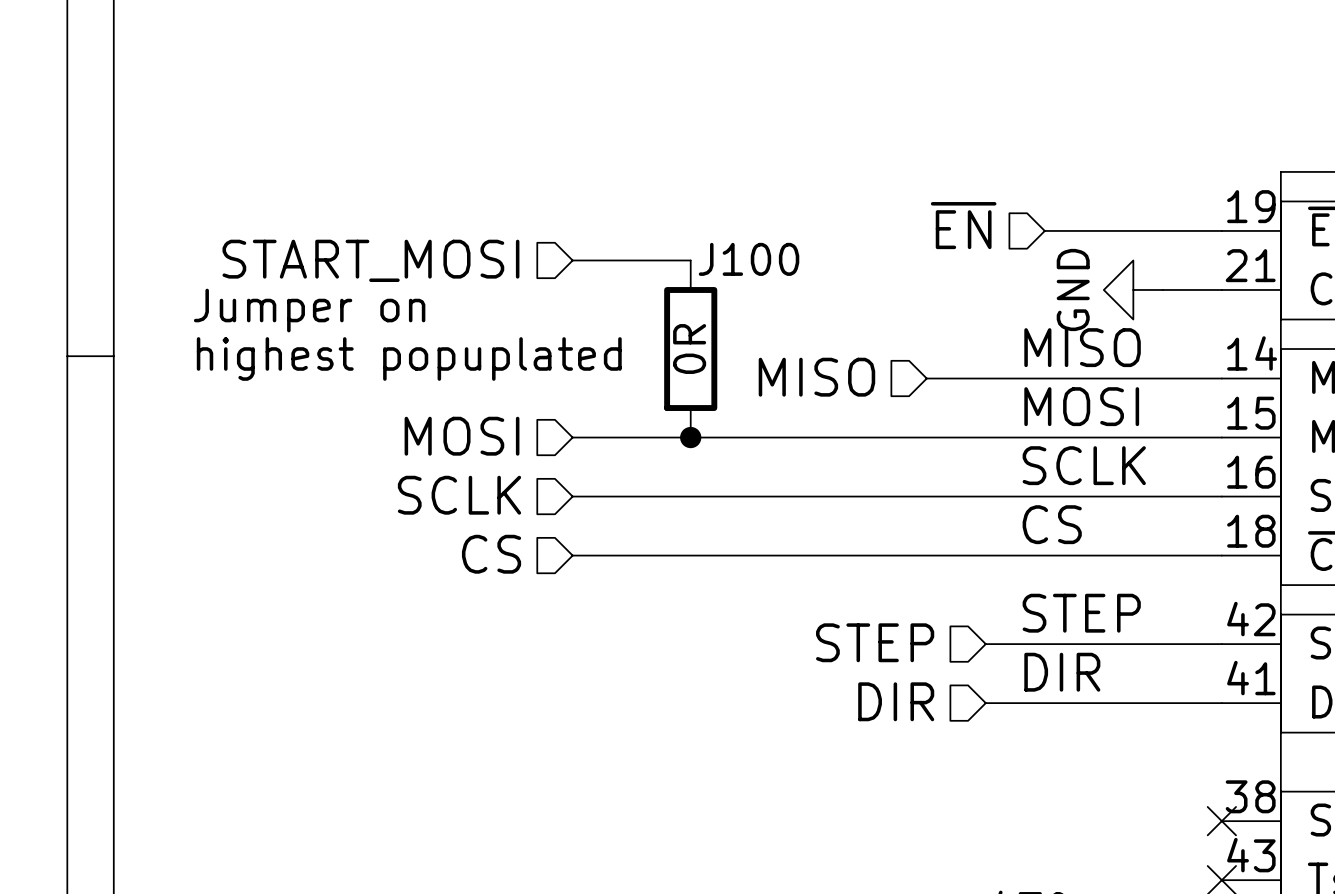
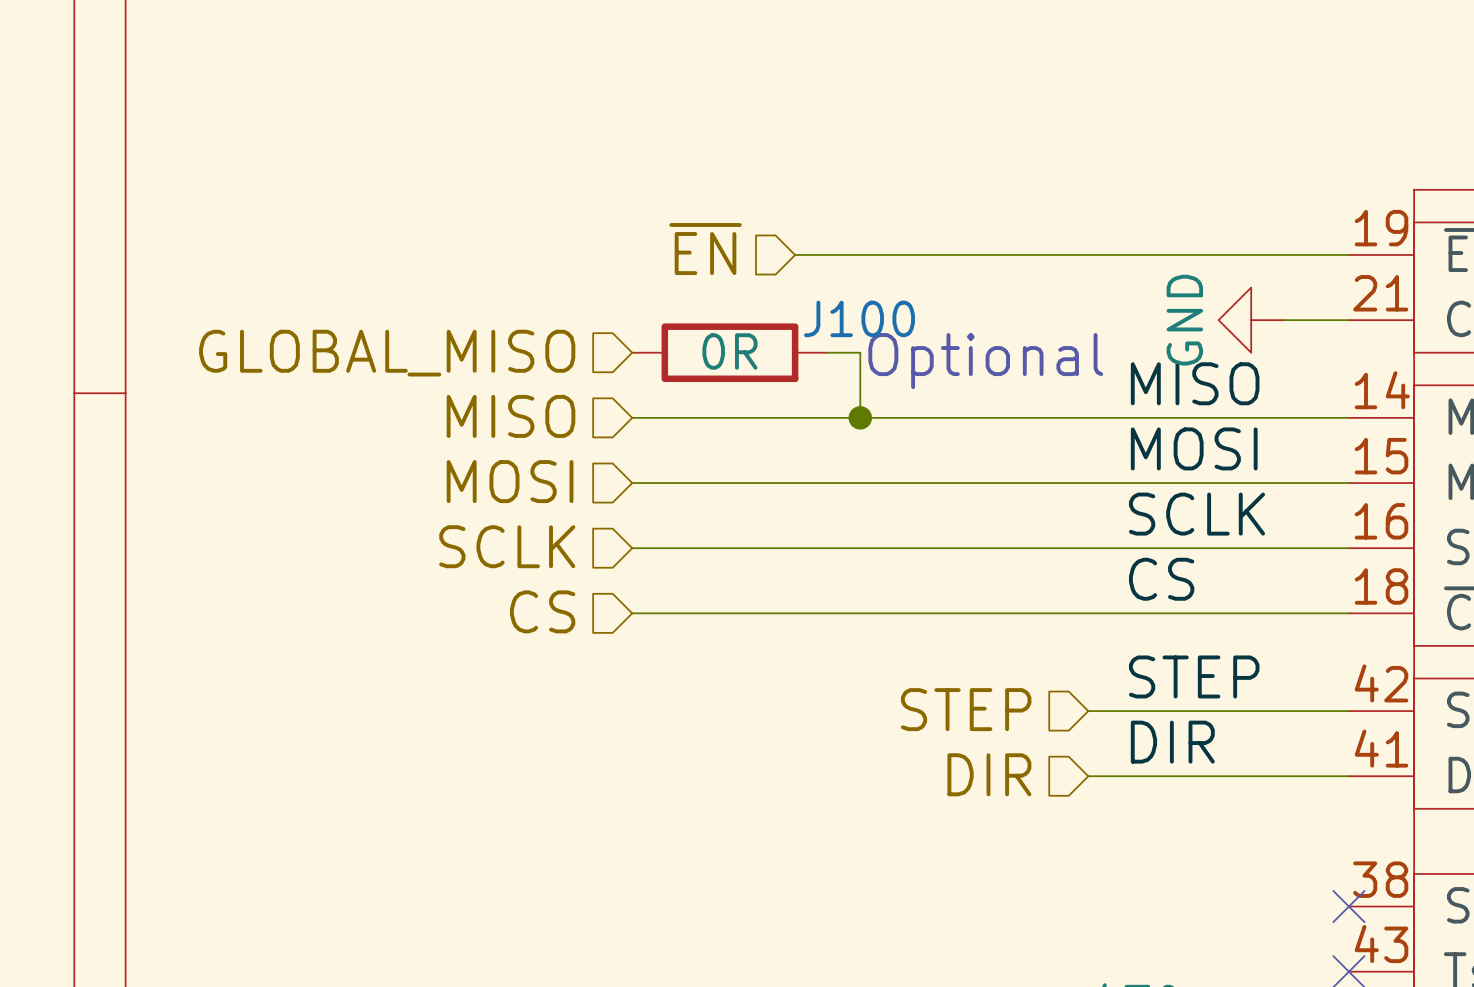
hierarchical label position: ~{EN} (963, 225) -> ~{EN} (705, 249)
wire: none -> (795, 254) (1153, 254)
J100 name position: J100 (749, 259) -> J100 (859, 318)
hierarchical label: START_MOSI (370, 260) -> none
wire: (572, 260) (690, 260) -> none
text: Jumper on (309, 310) -> none
hierarchical label: none -> GLOBAL_MISO (387, 353)
wire: none -> (827, 352) (860, 352) (860, 417)
text: none -> Optional (985, 361)
J100 rotation: 0° (690, 349) -> 90° clockwise (729, 352)
text: highest popuplated (409, 358) -> none
hierarchical label position: MISO (816, 377) -> MISO (510, 416)
wire: none -> (632, 417) (1023, 417)
junction position: (690, 437) -> (860, 417)

